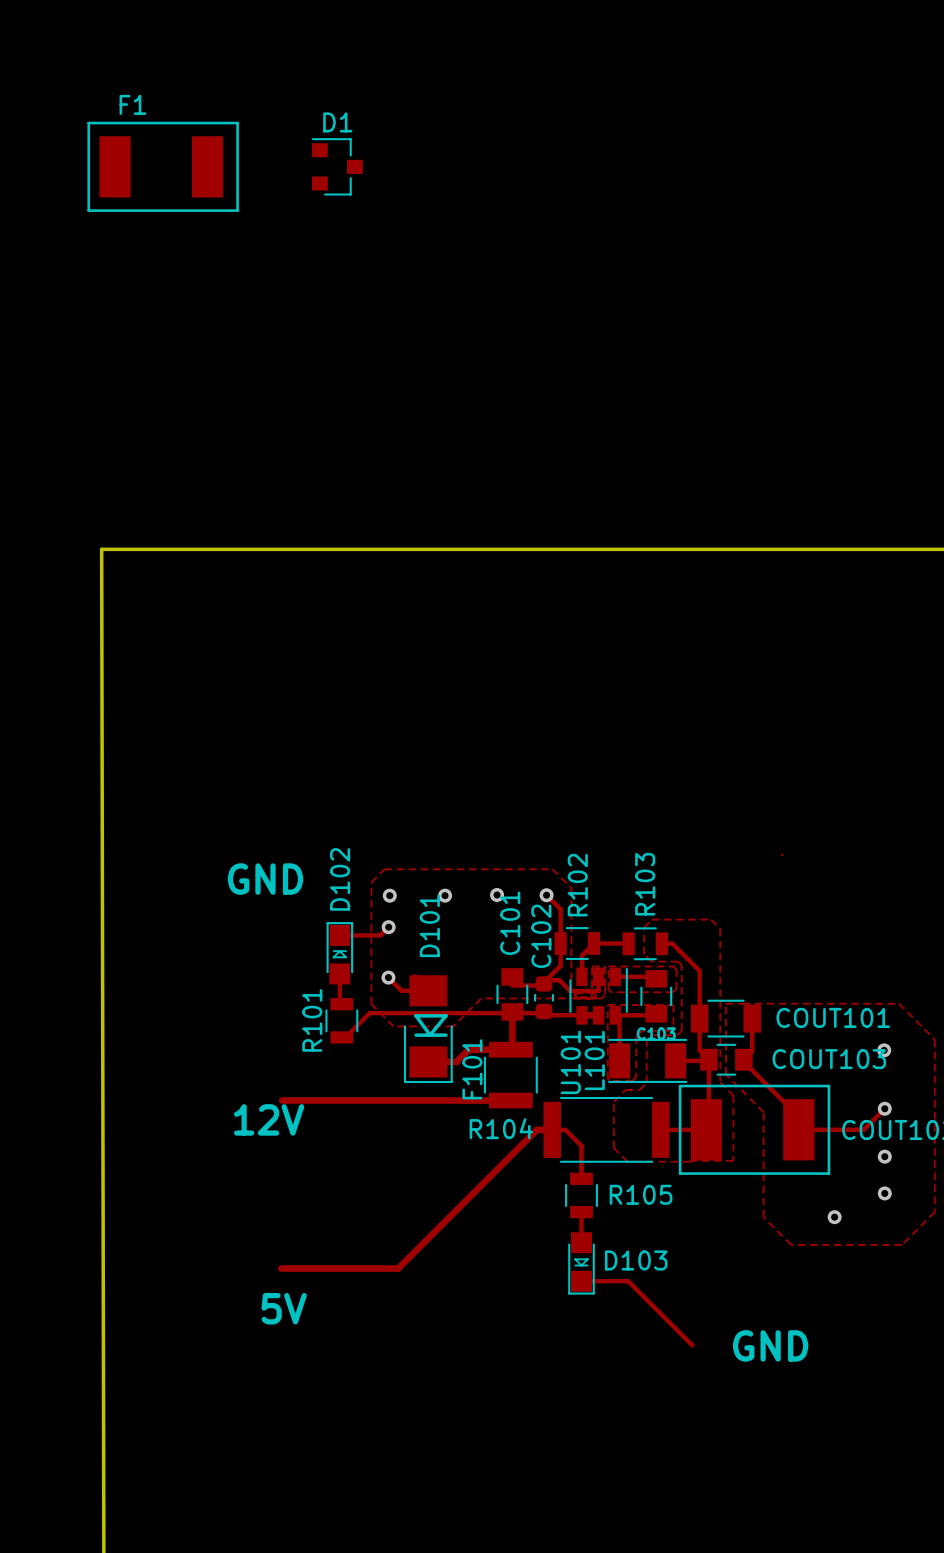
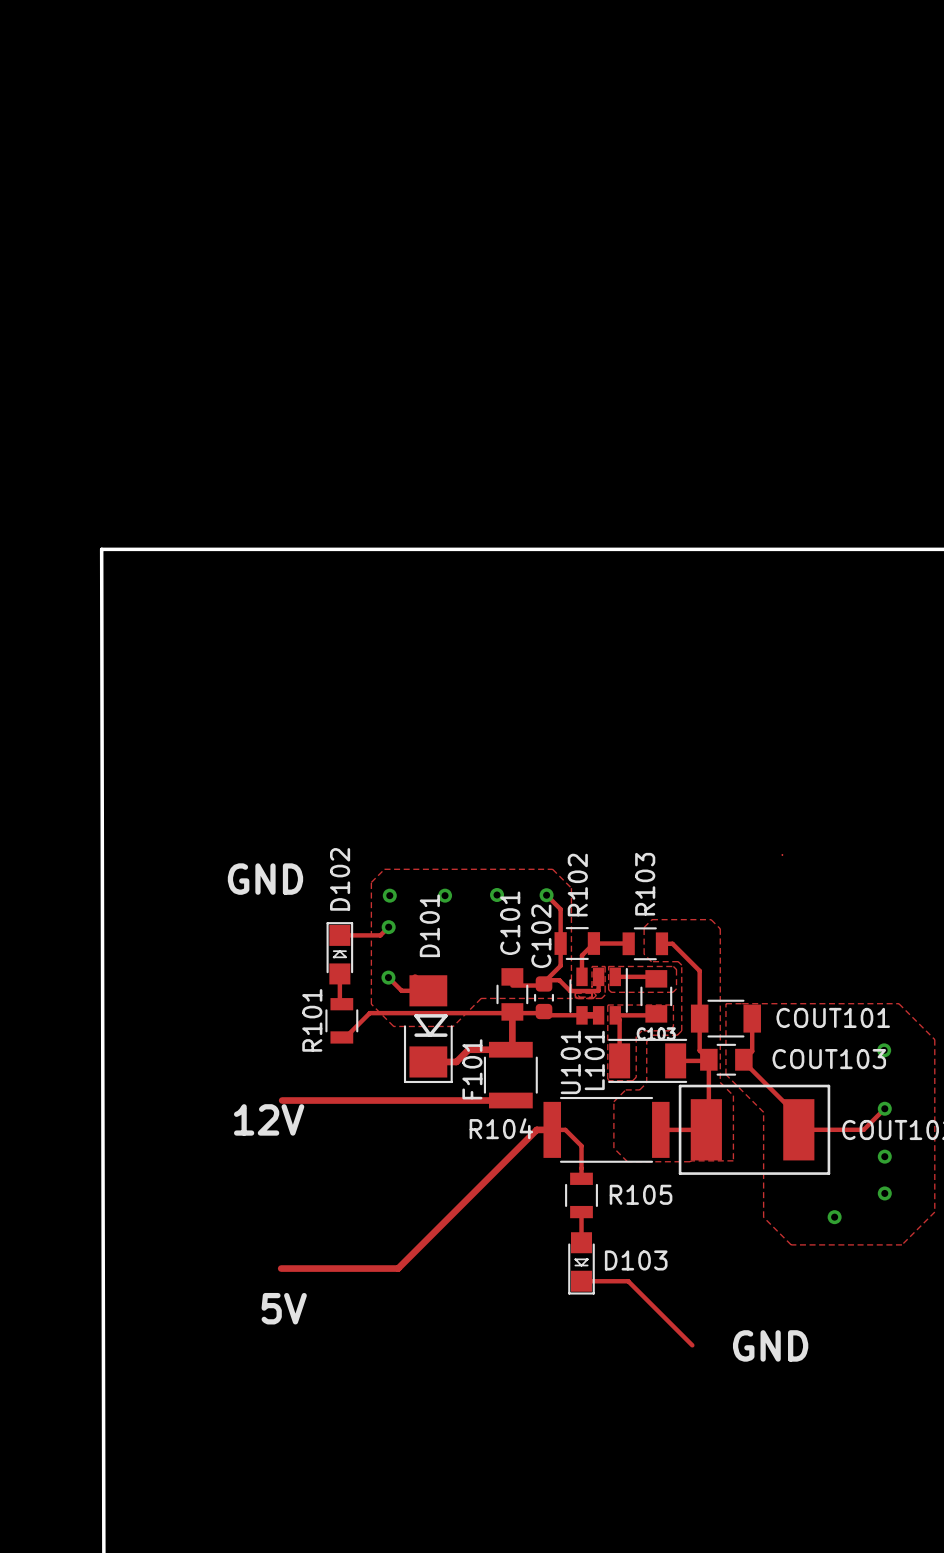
F1: (163, 166) -> none
D1: (337, 166) -> none

